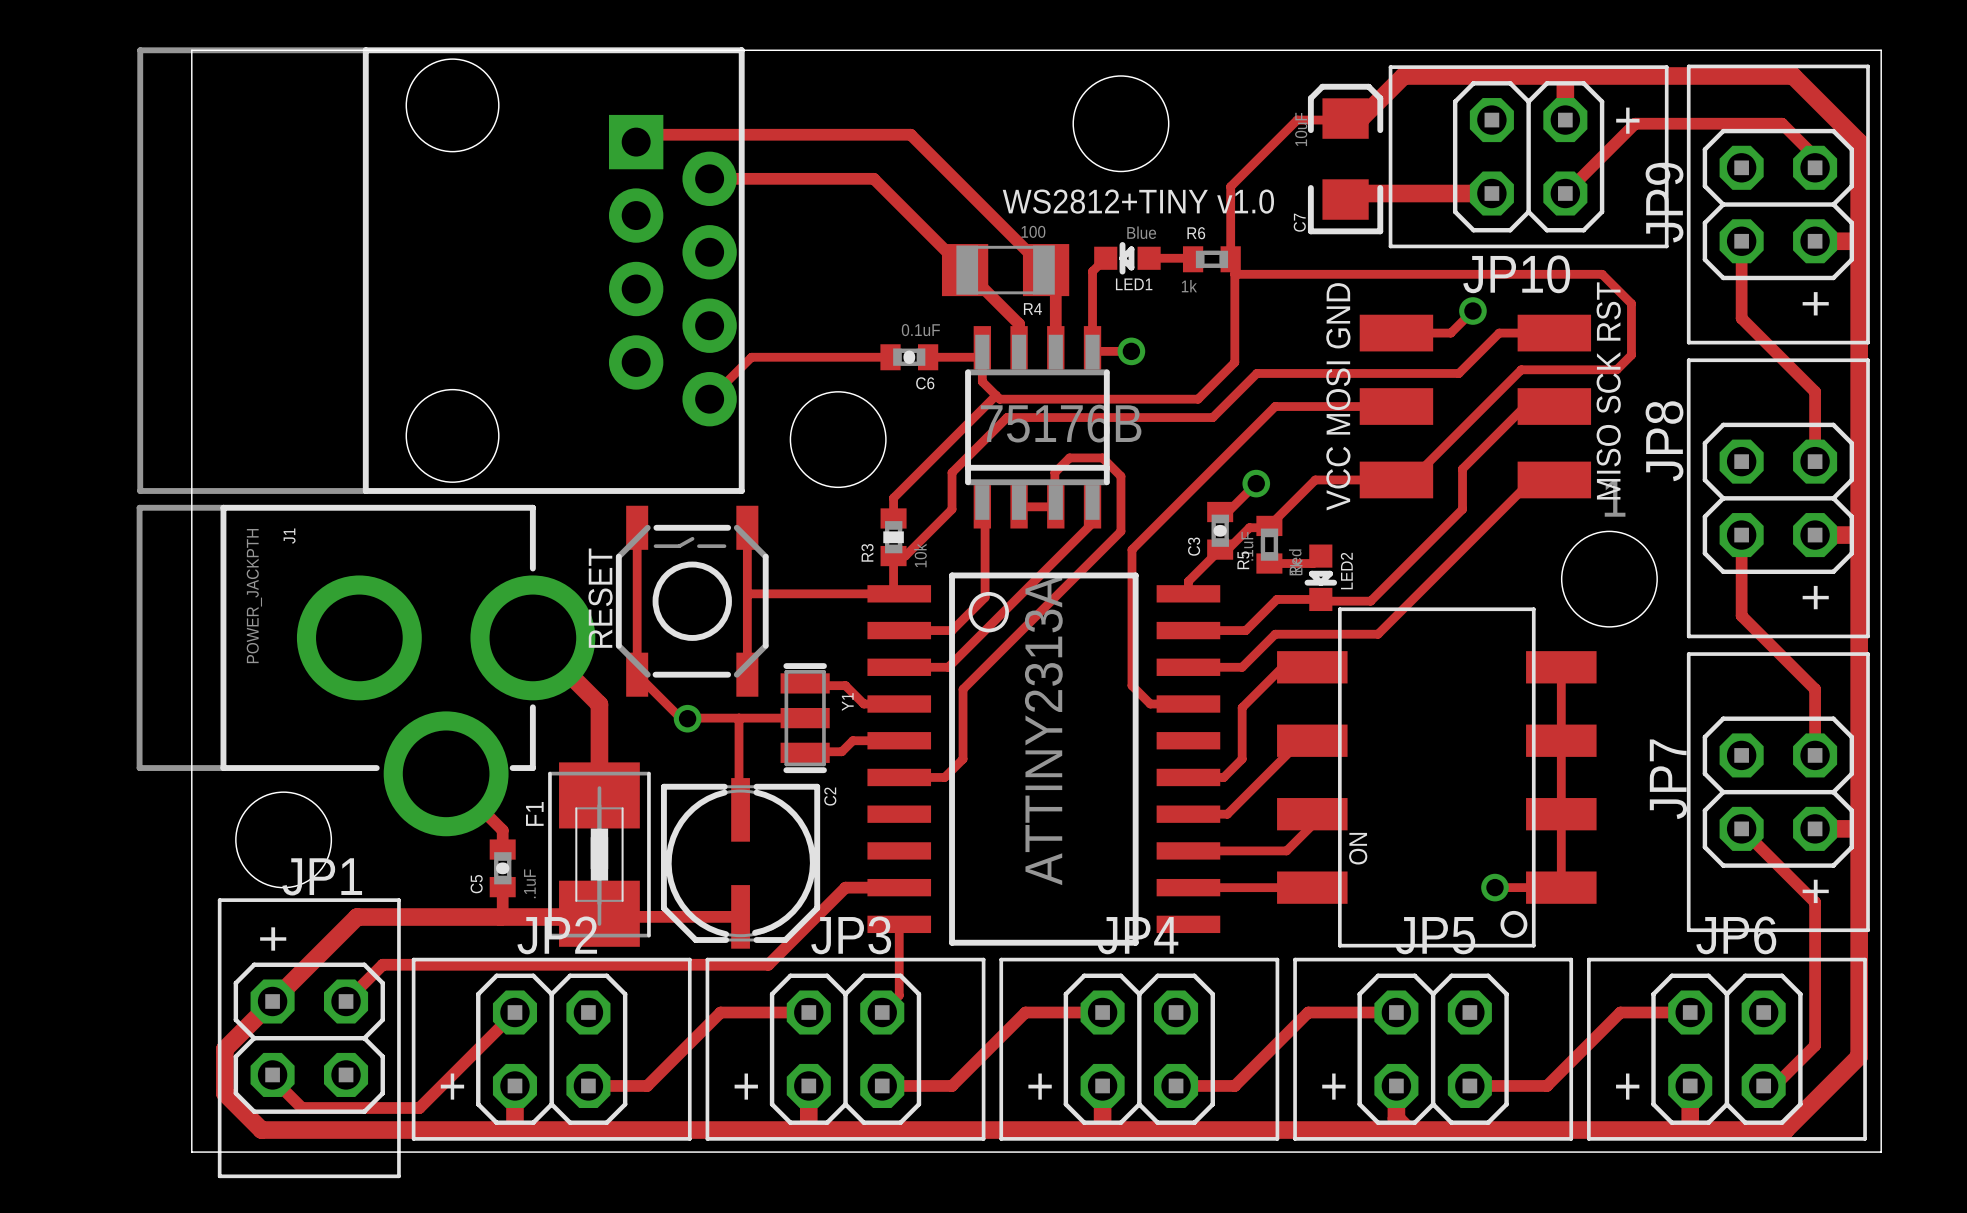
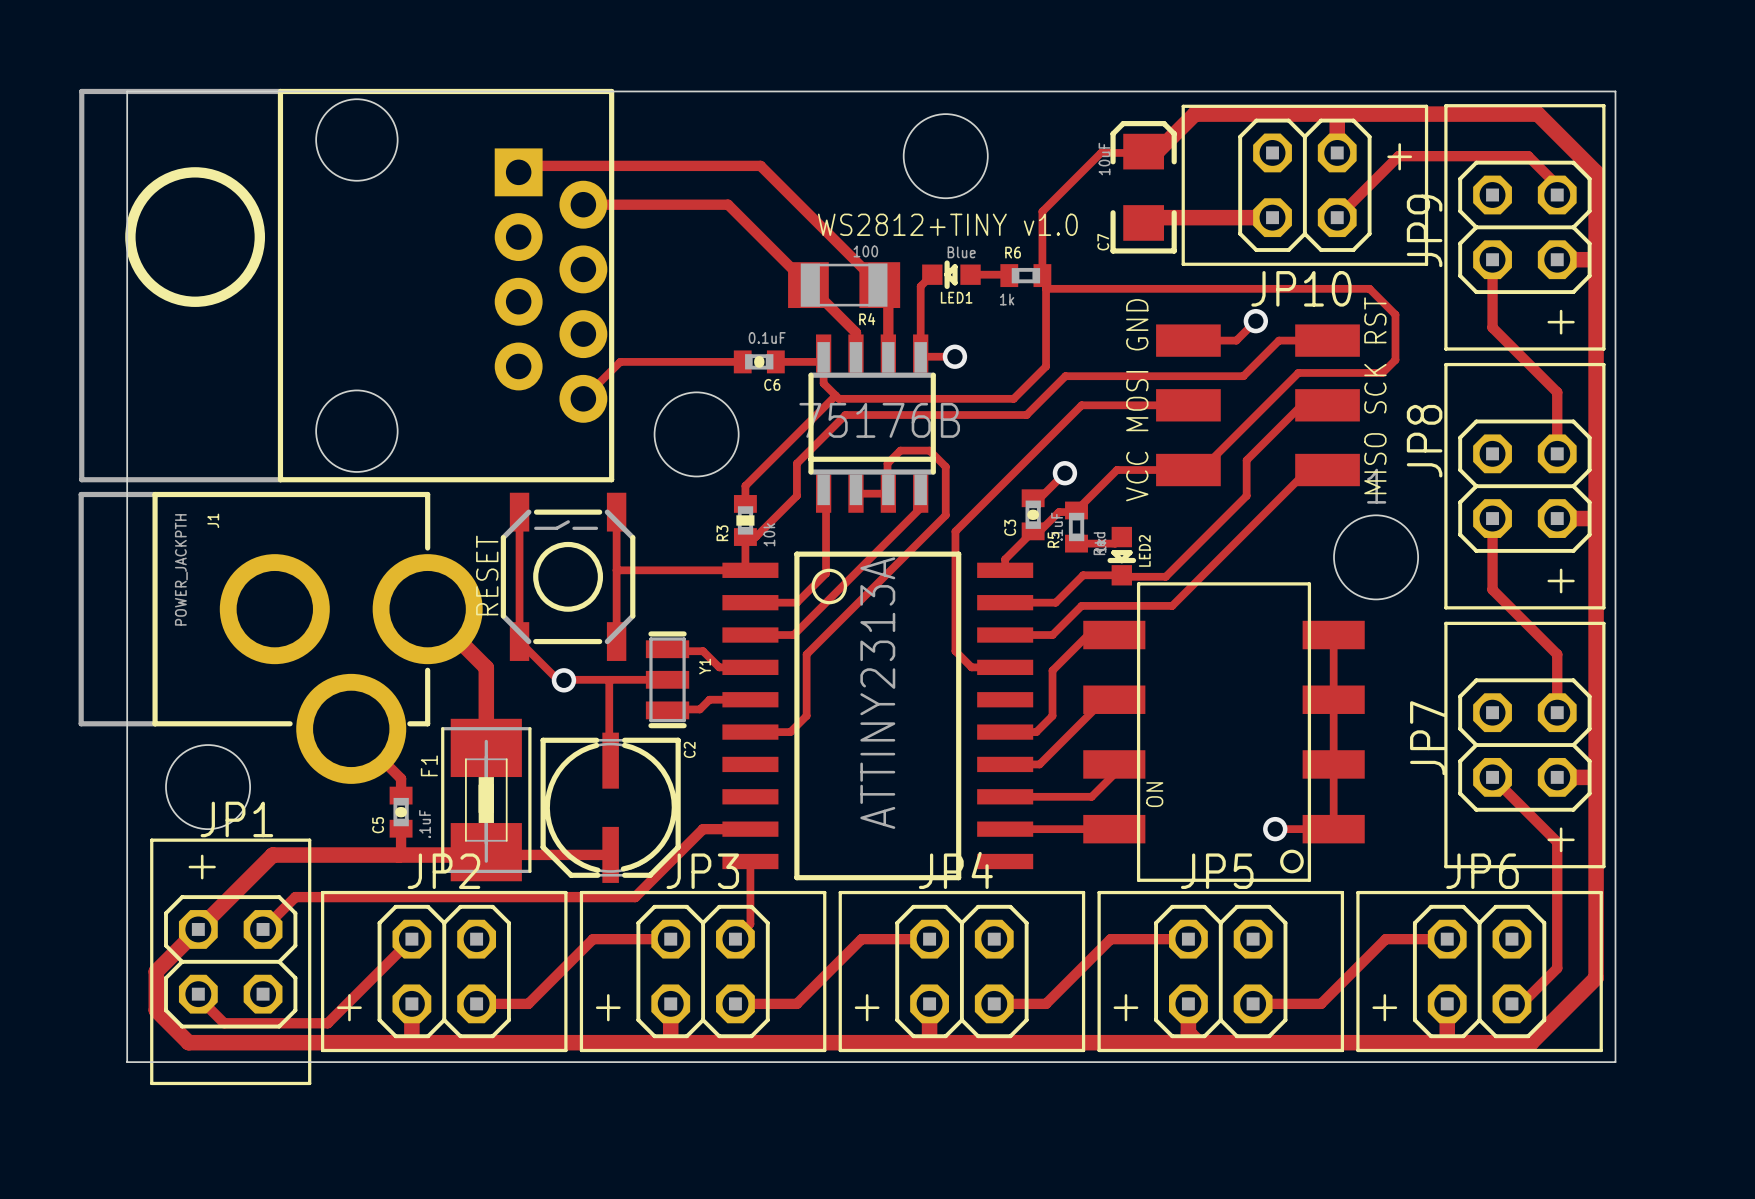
drawing: none -> [125, 167, 266, 307]

